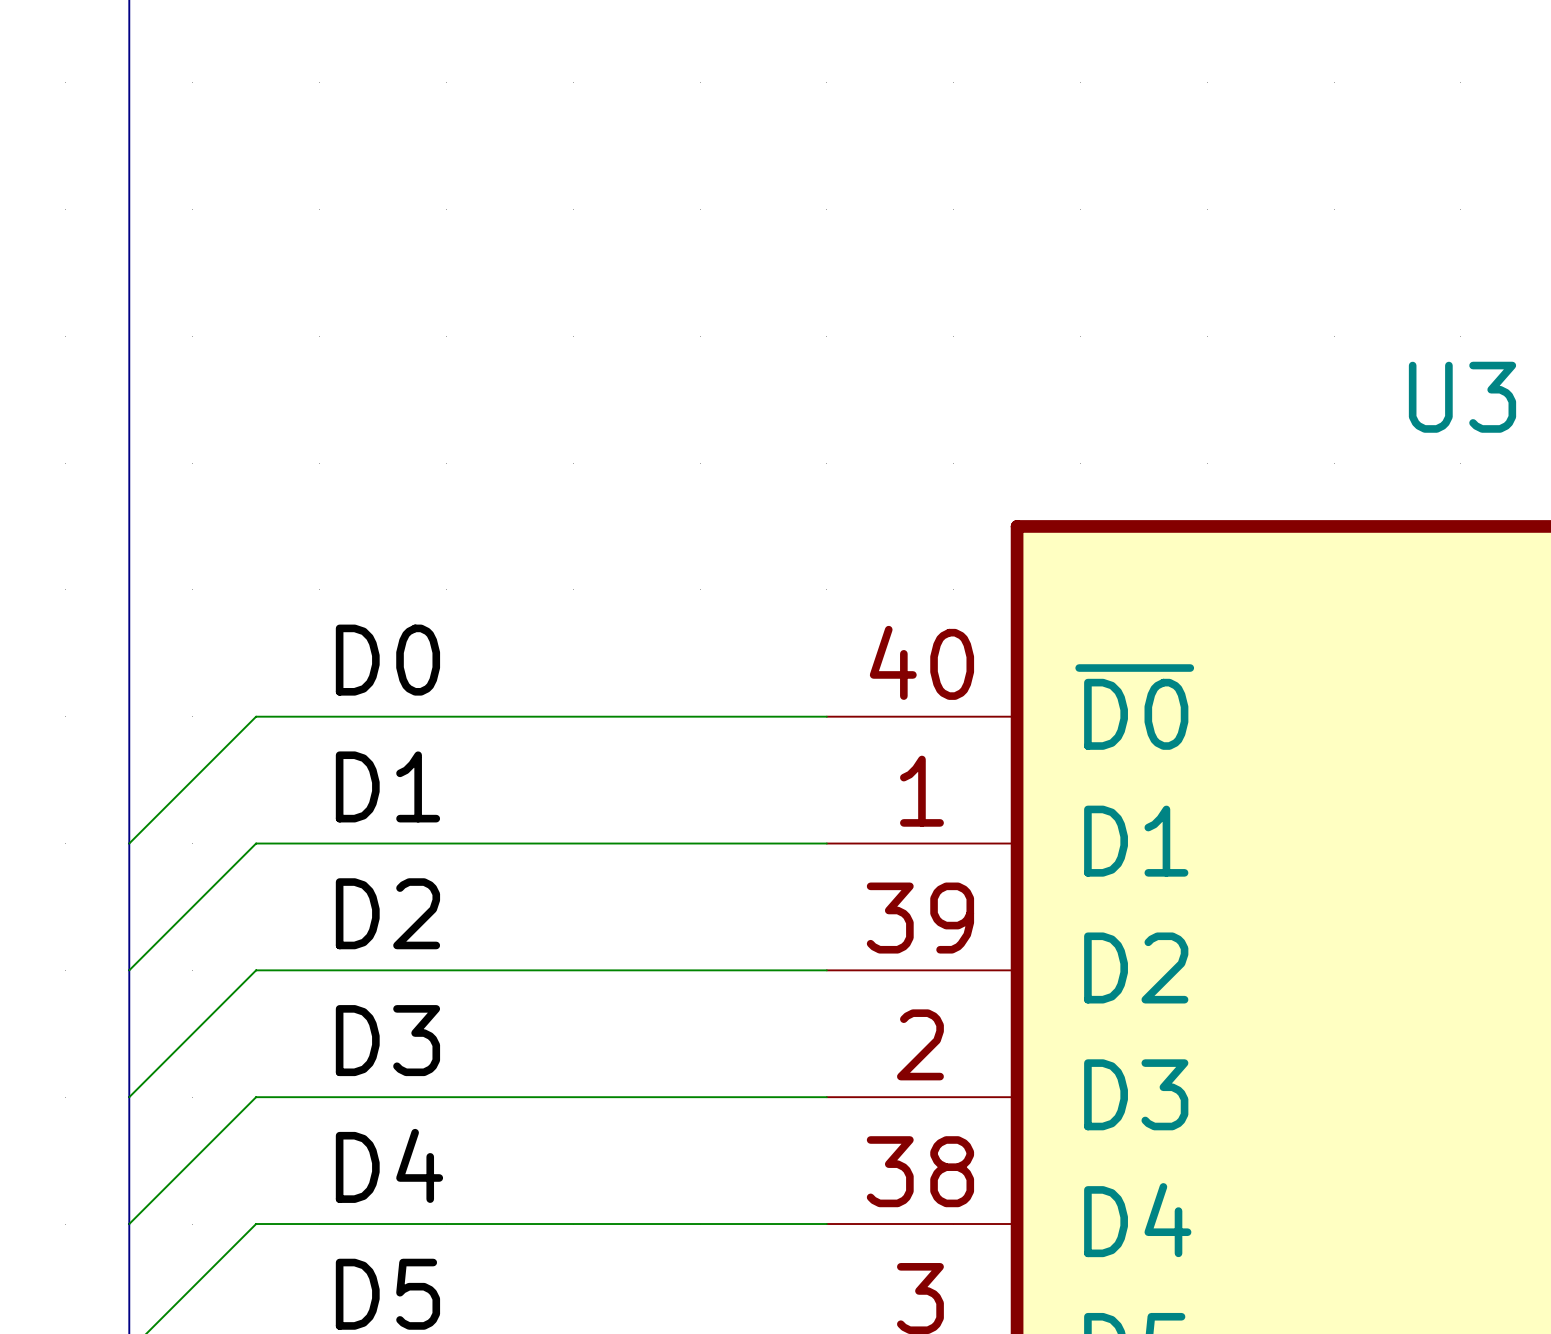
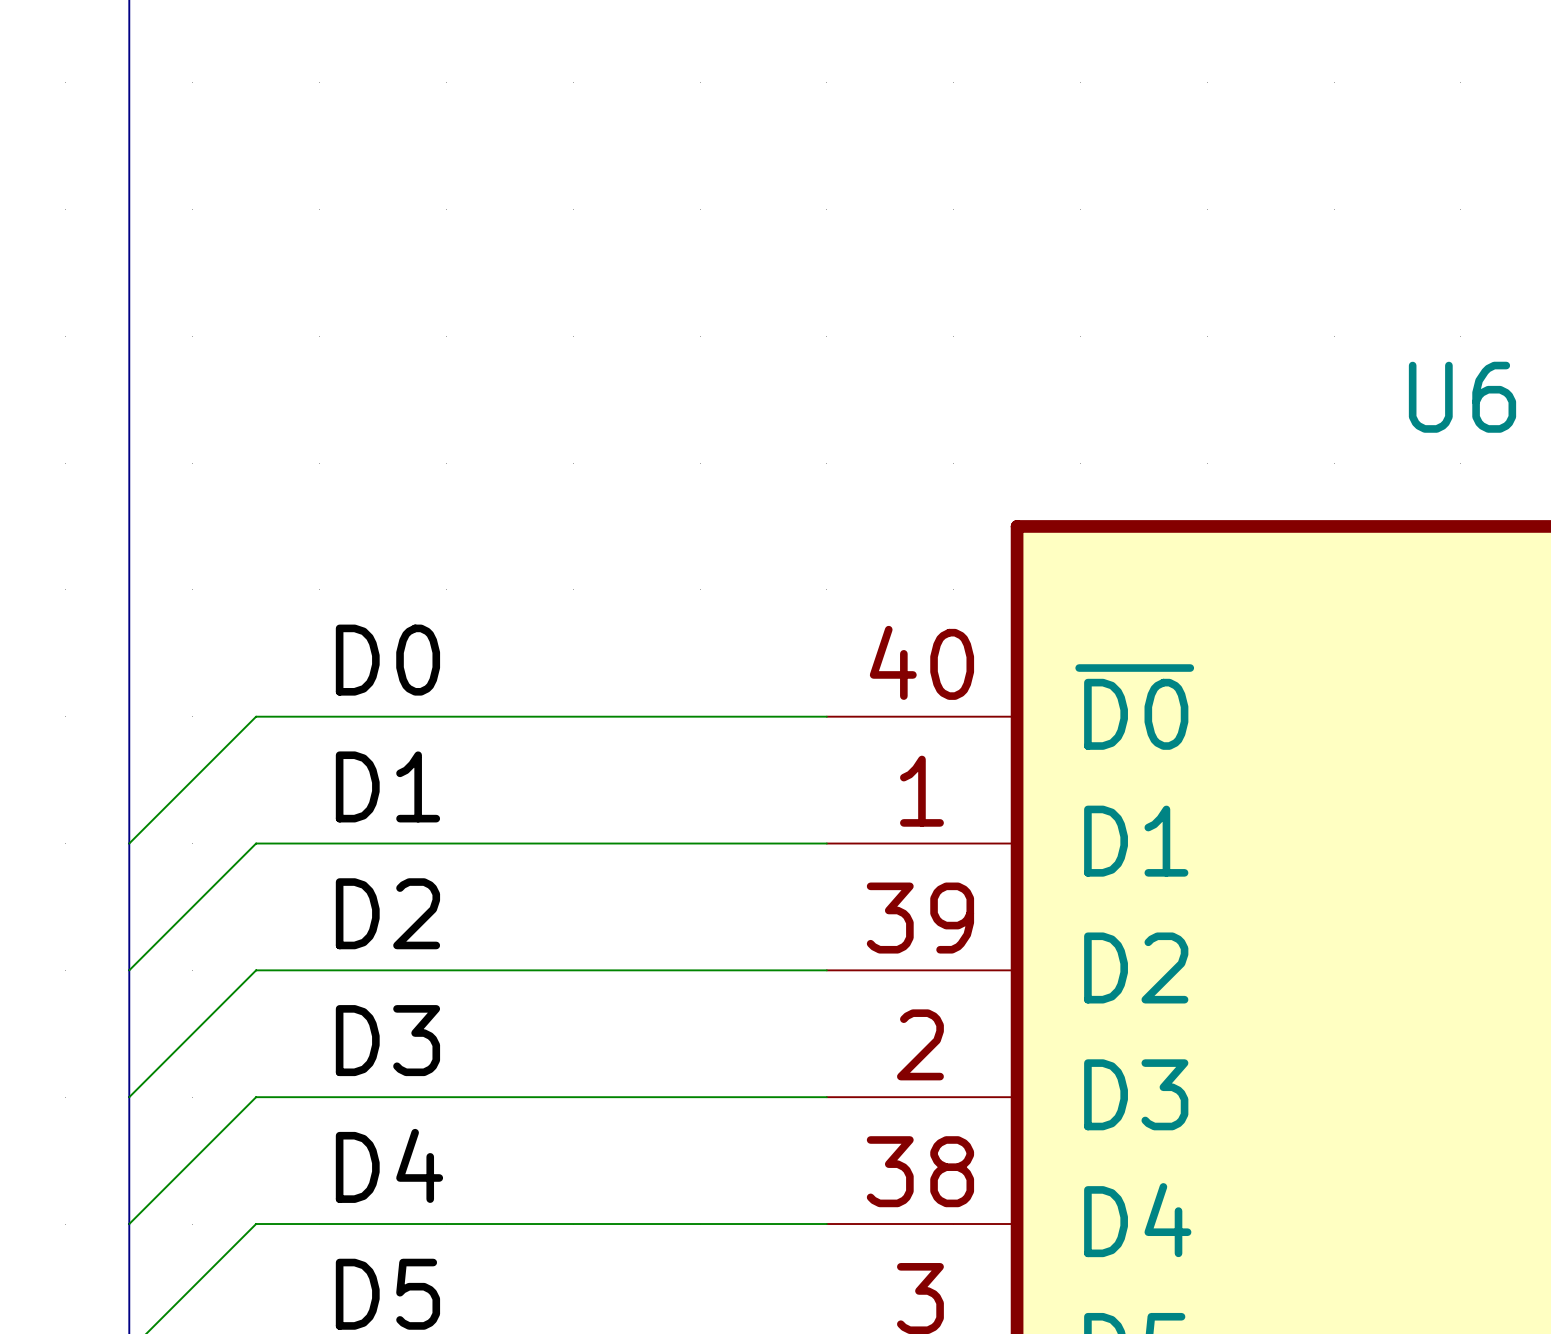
U3 name: U3 (1462, 397) -> U6 (1462, 397)

